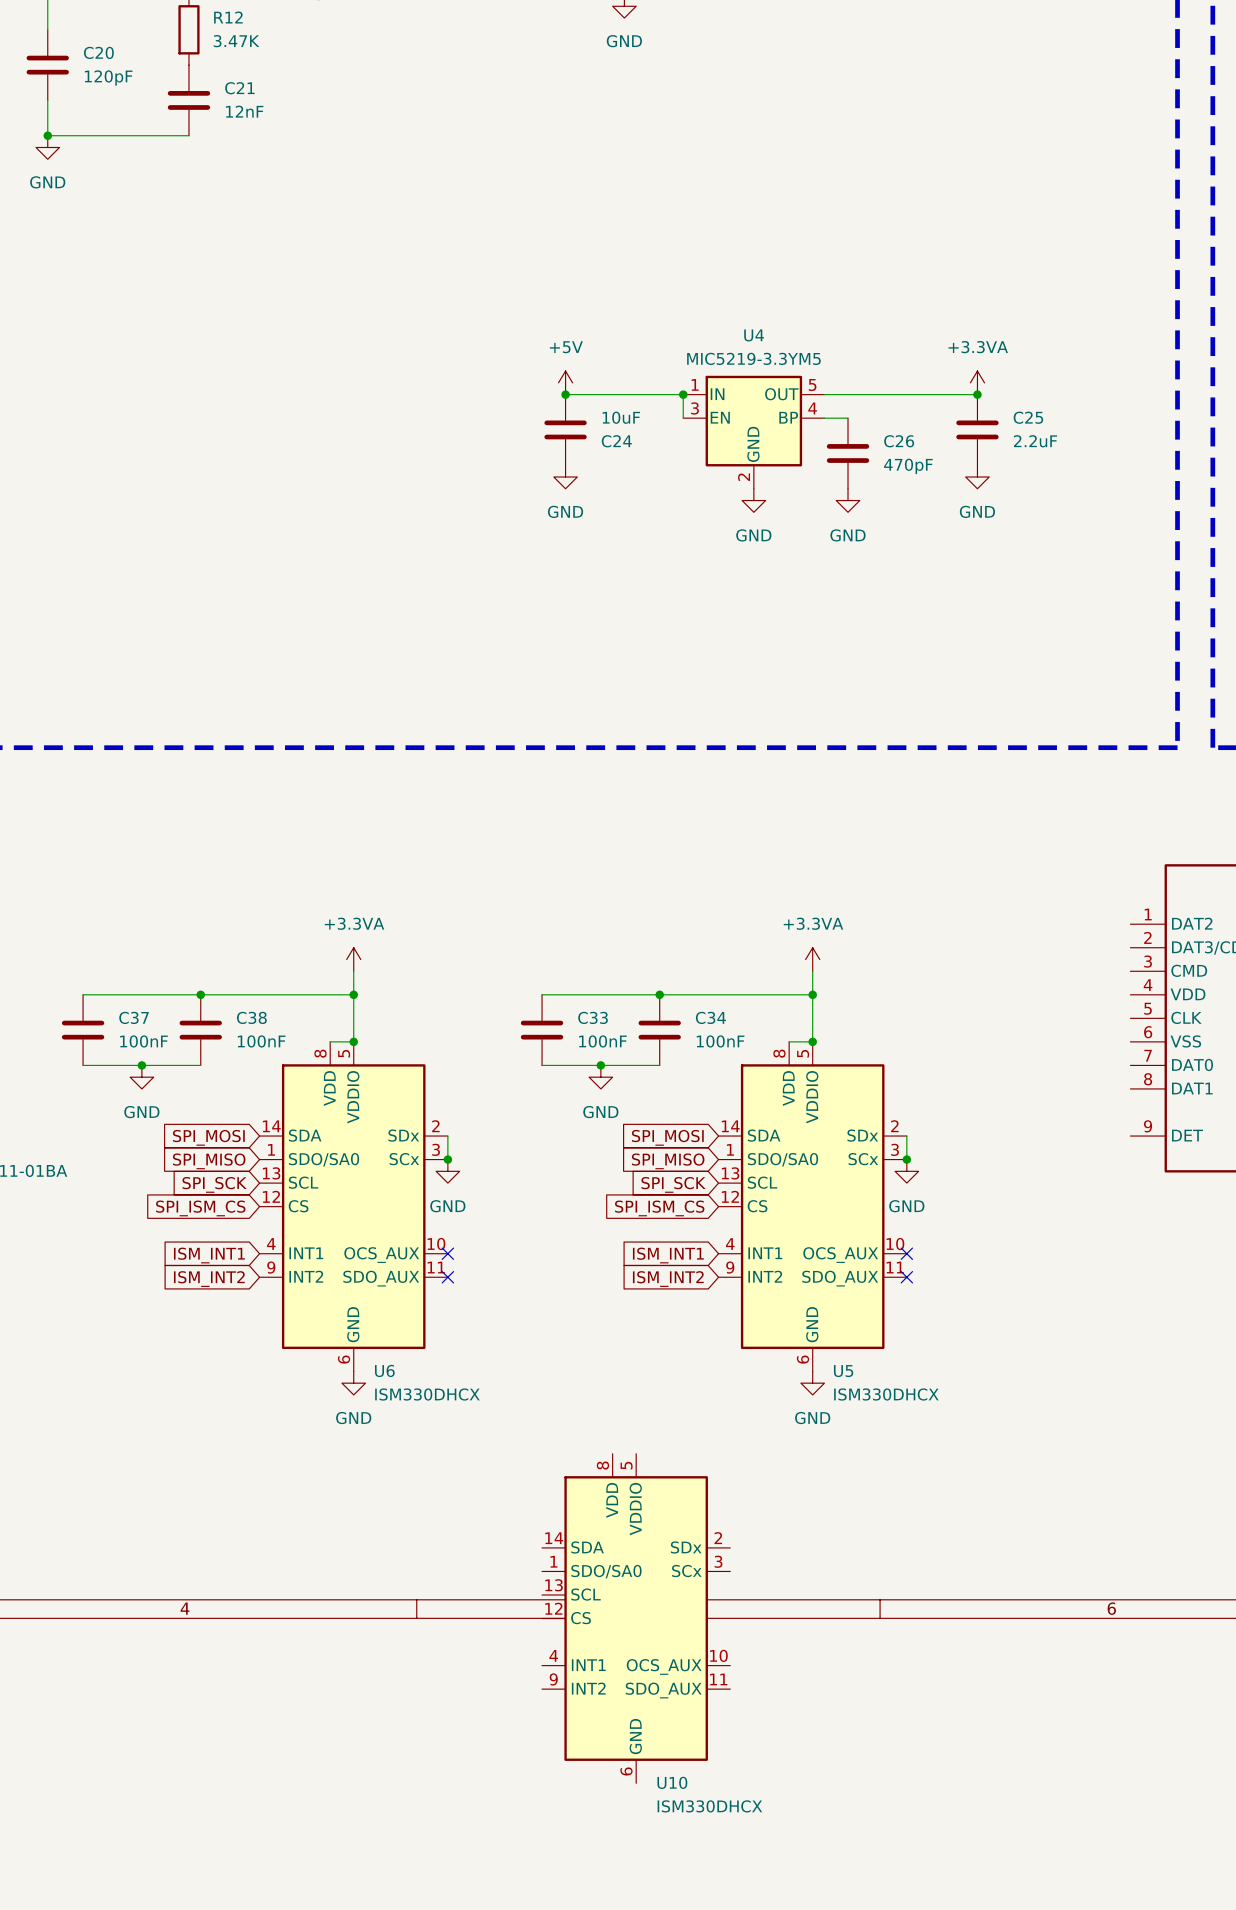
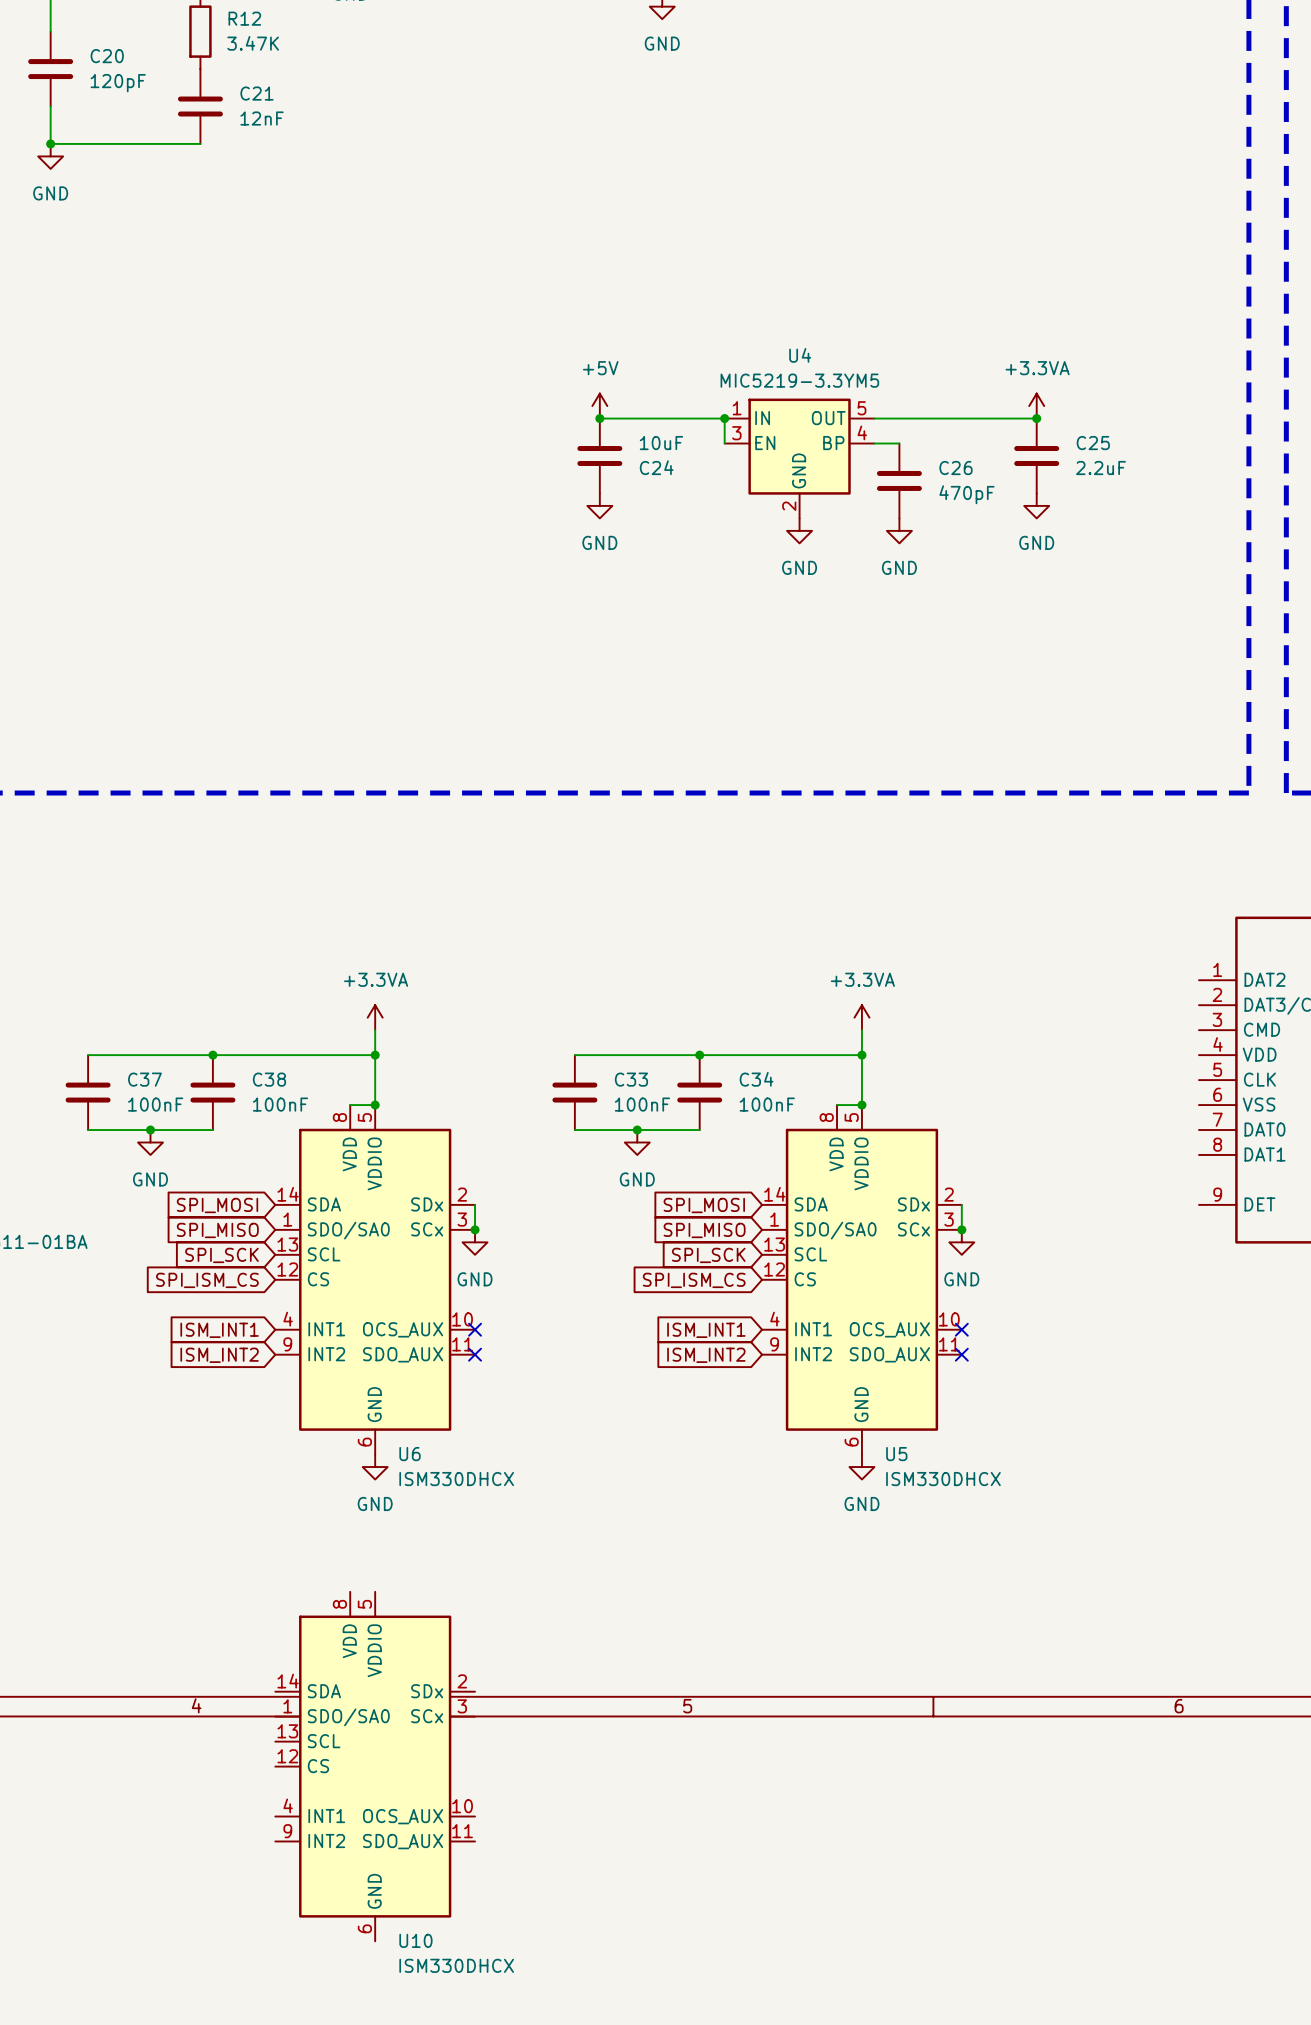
U10 position: (636, 1618) -> (375, 1766)

